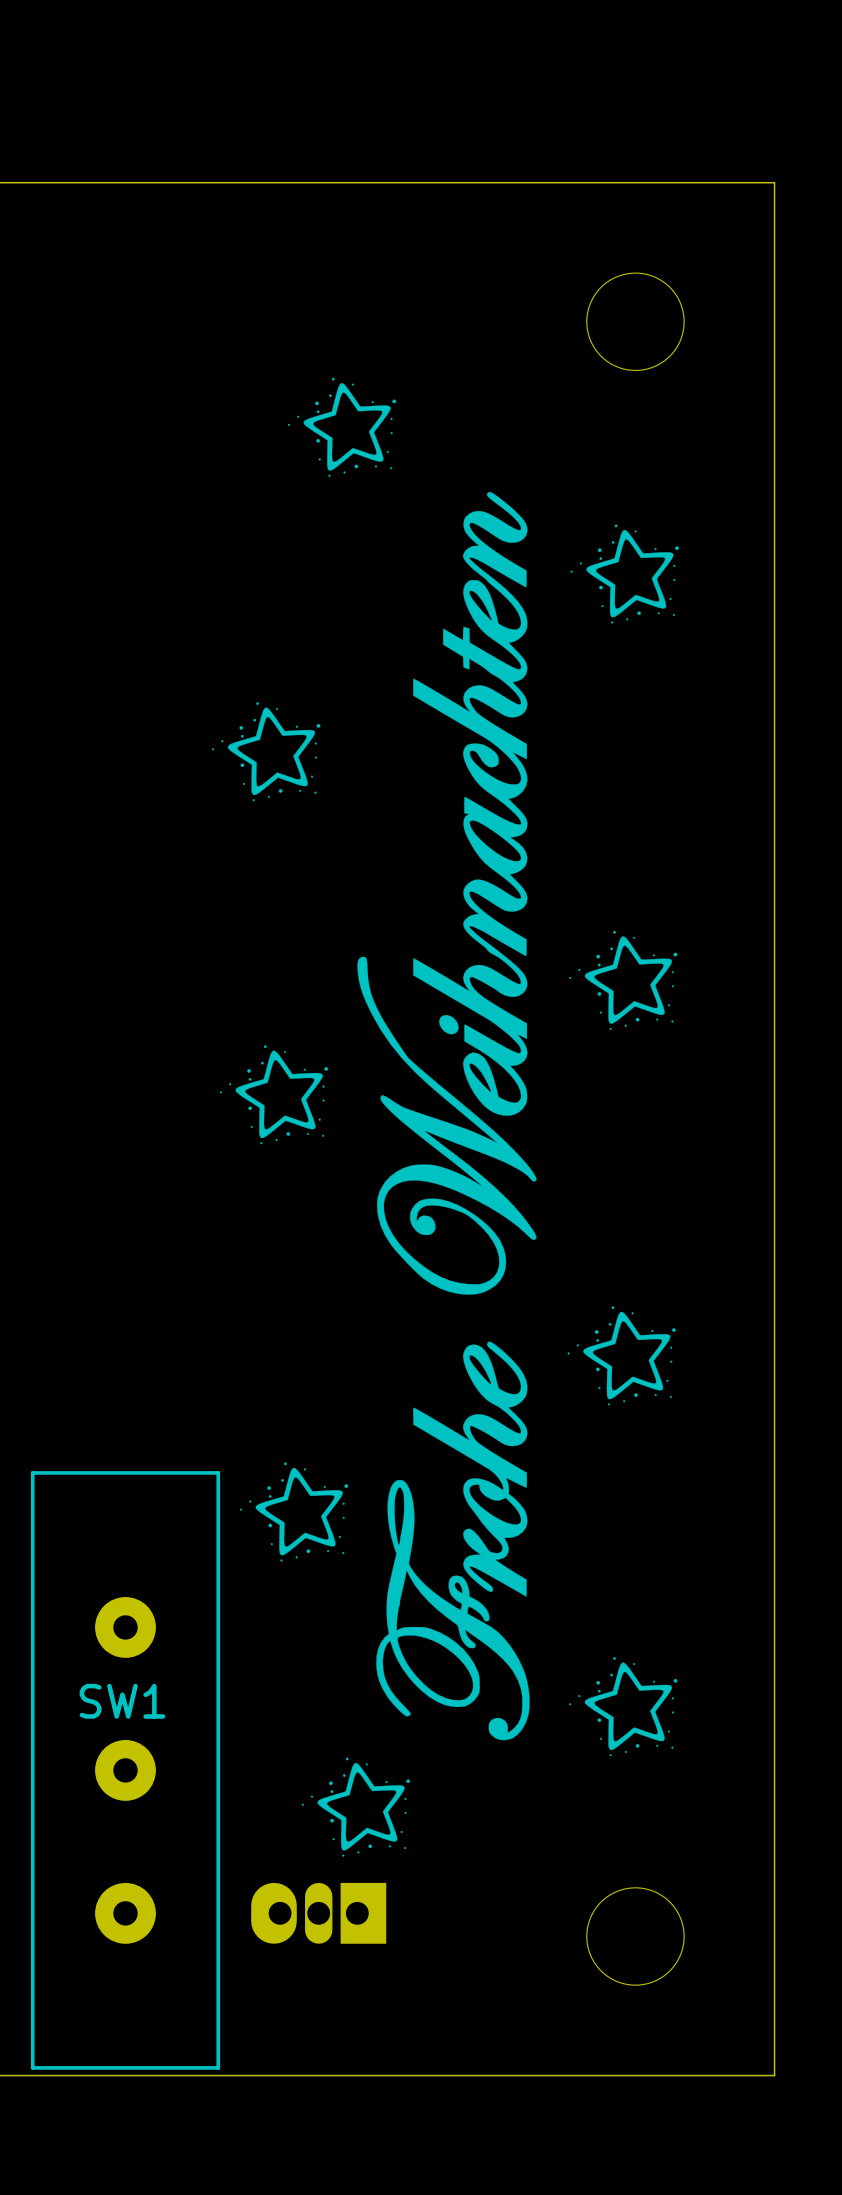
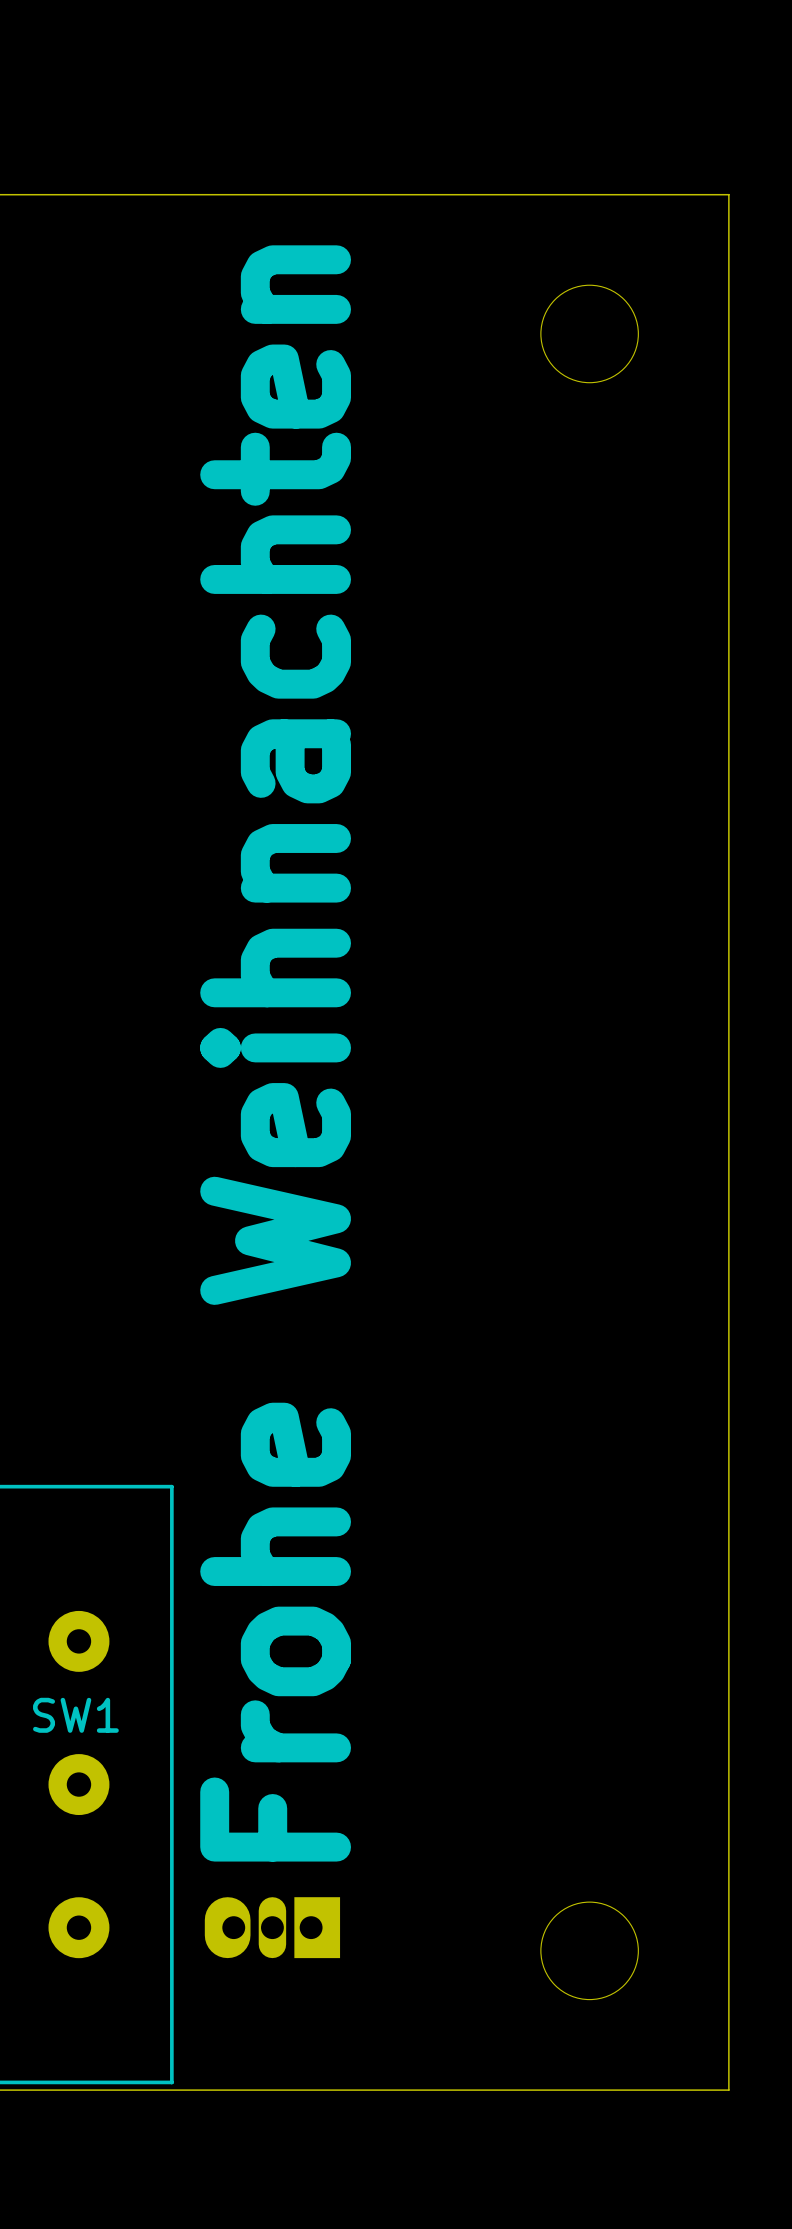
drawing: [219, 377, 679, 1857] -> none
drawing: [212, 702, 321, 802] -> none
text: none -> Frohe Weihnachten (275, 1053)

